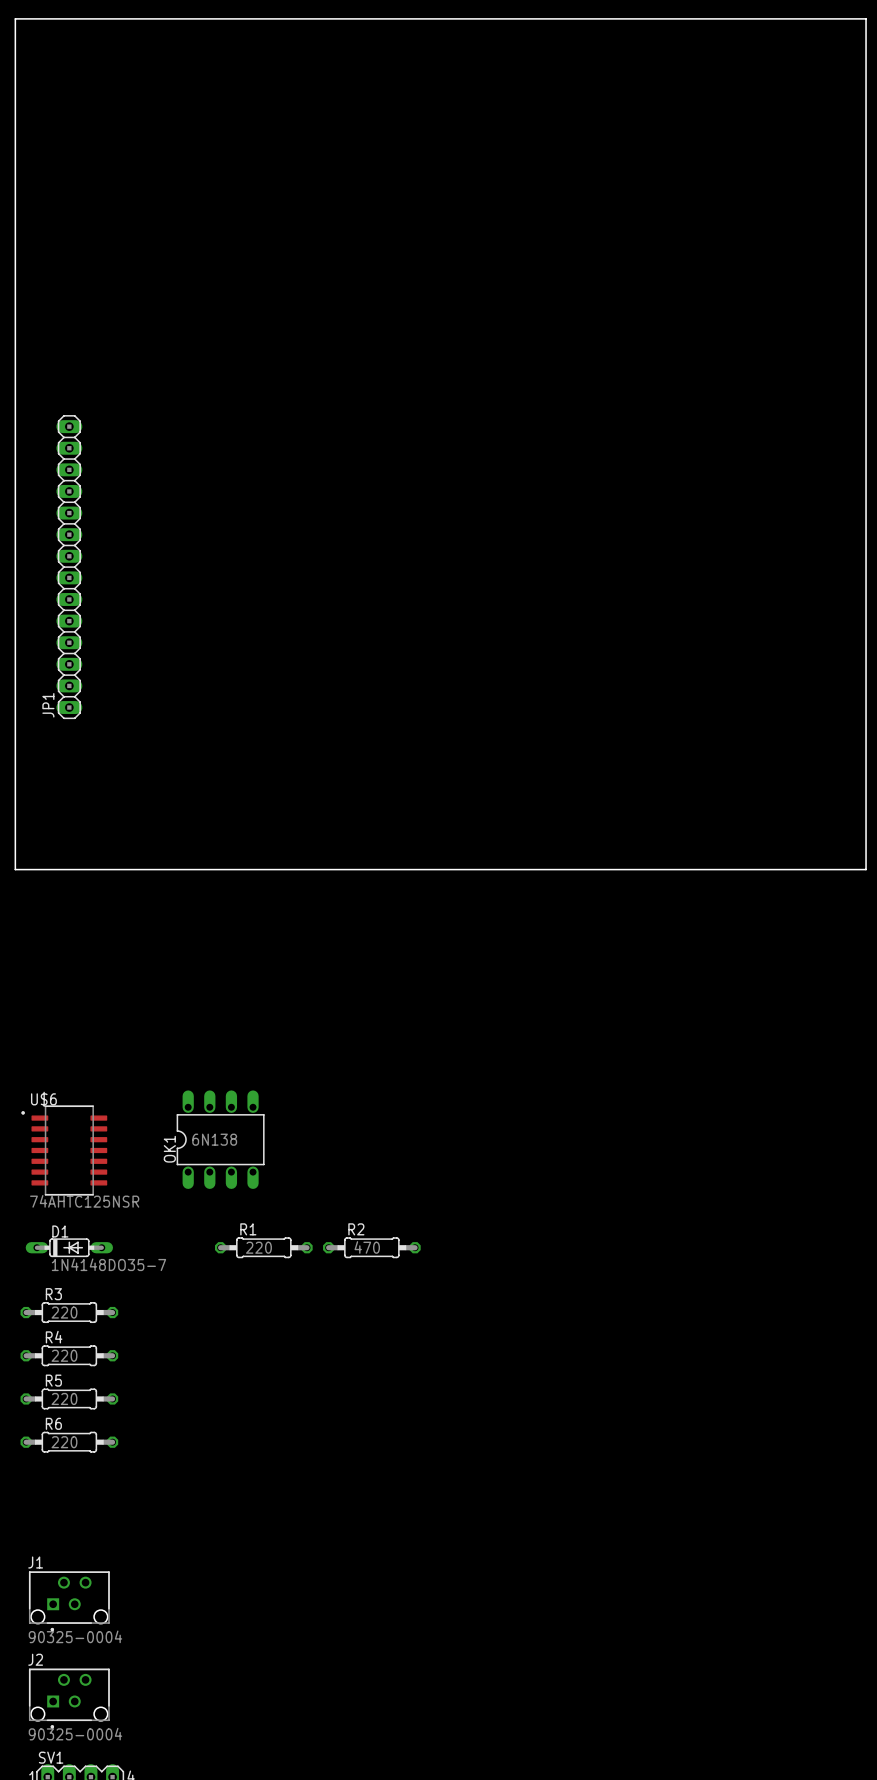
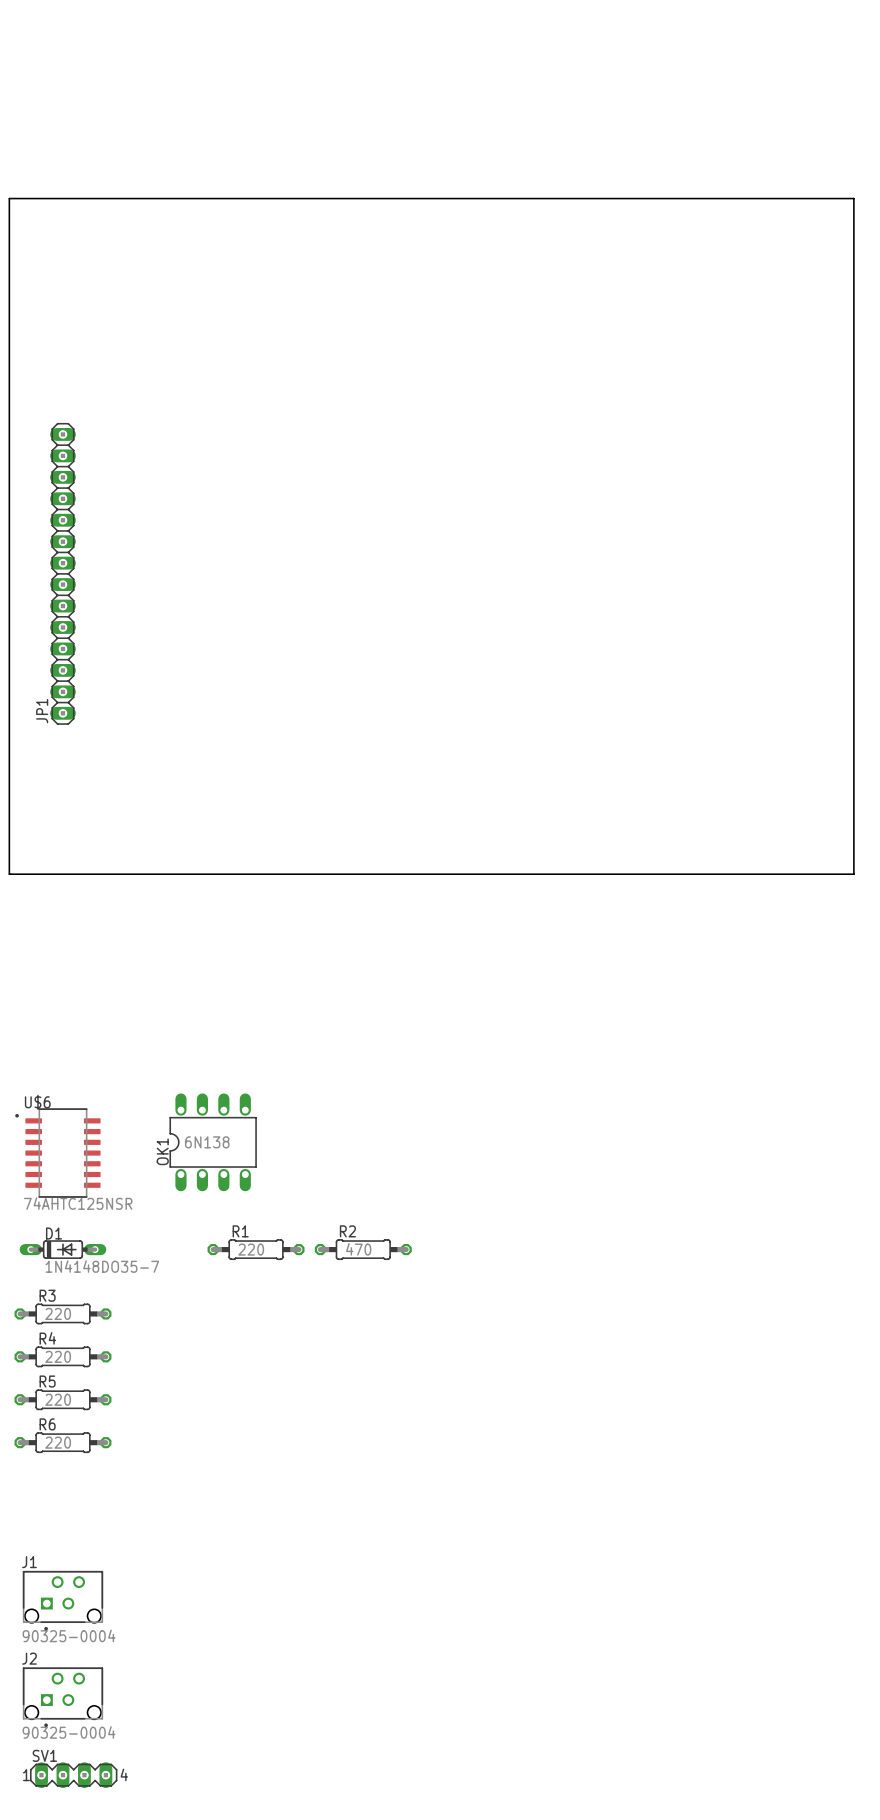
board edge: (15, 189) (15, 18) (866, 18) (866, 189) -> (9, 198) (853, 198)

